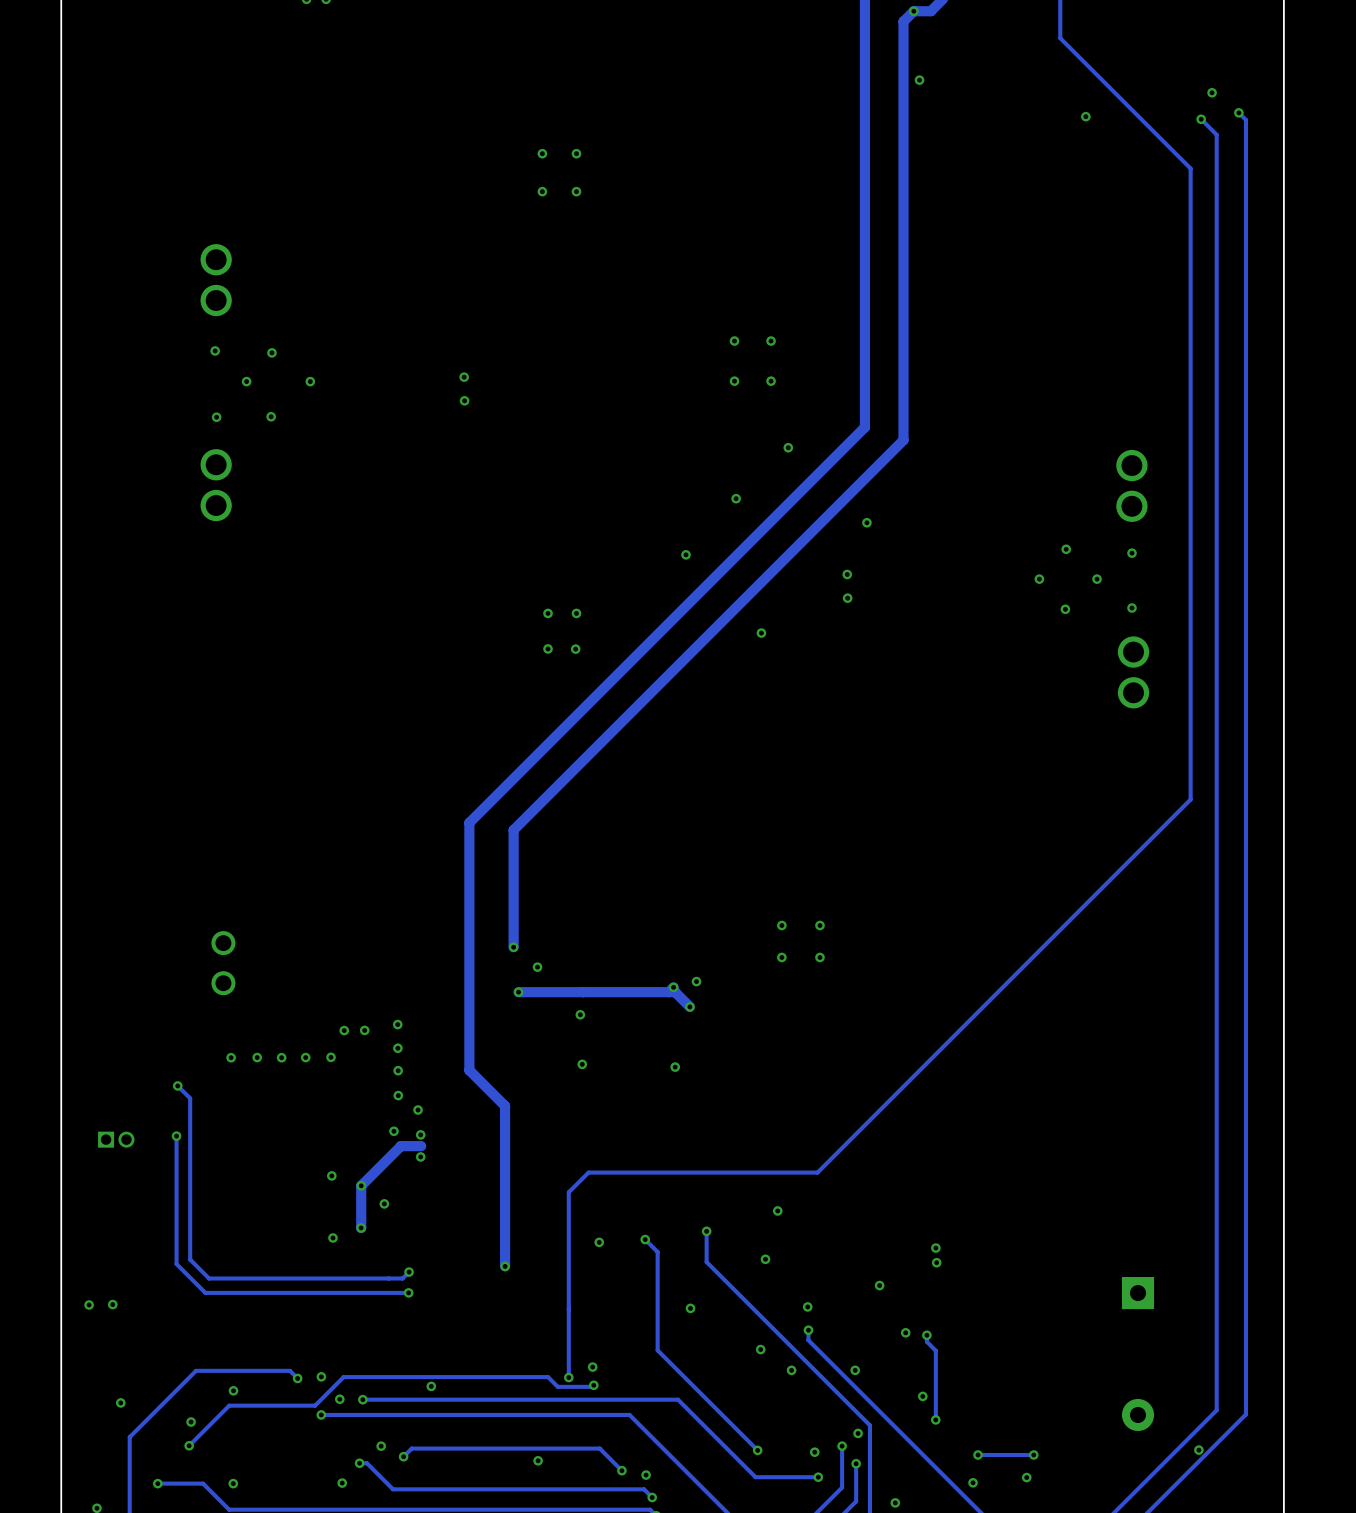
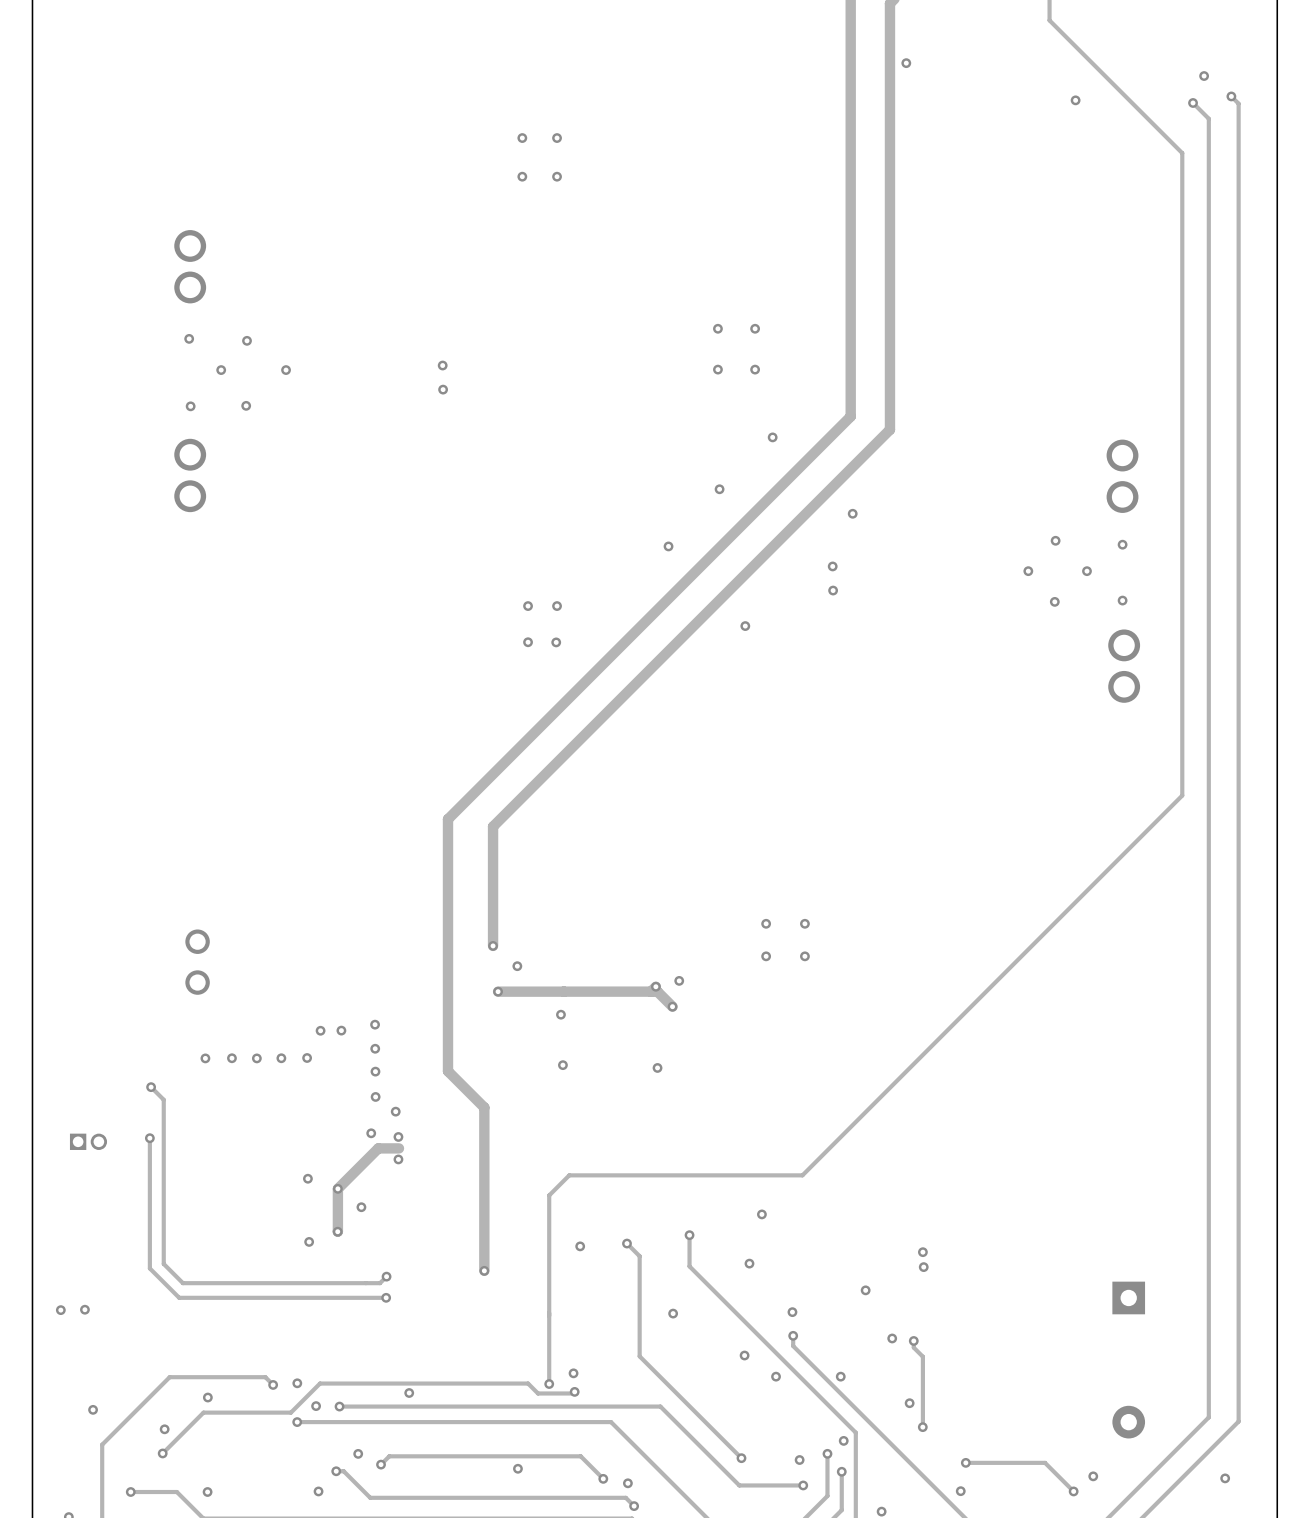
via: (1198, 1450) -> none
track: none -> (1022, 1462) (1045, 1462) (1073, 1491)
via: (1033, 1455) -> none
via: none -> (1093, 1476)
via: none -> (1225, 1478)
via: (1026, 1477) -> none
via: none -> (1073, 1491)

